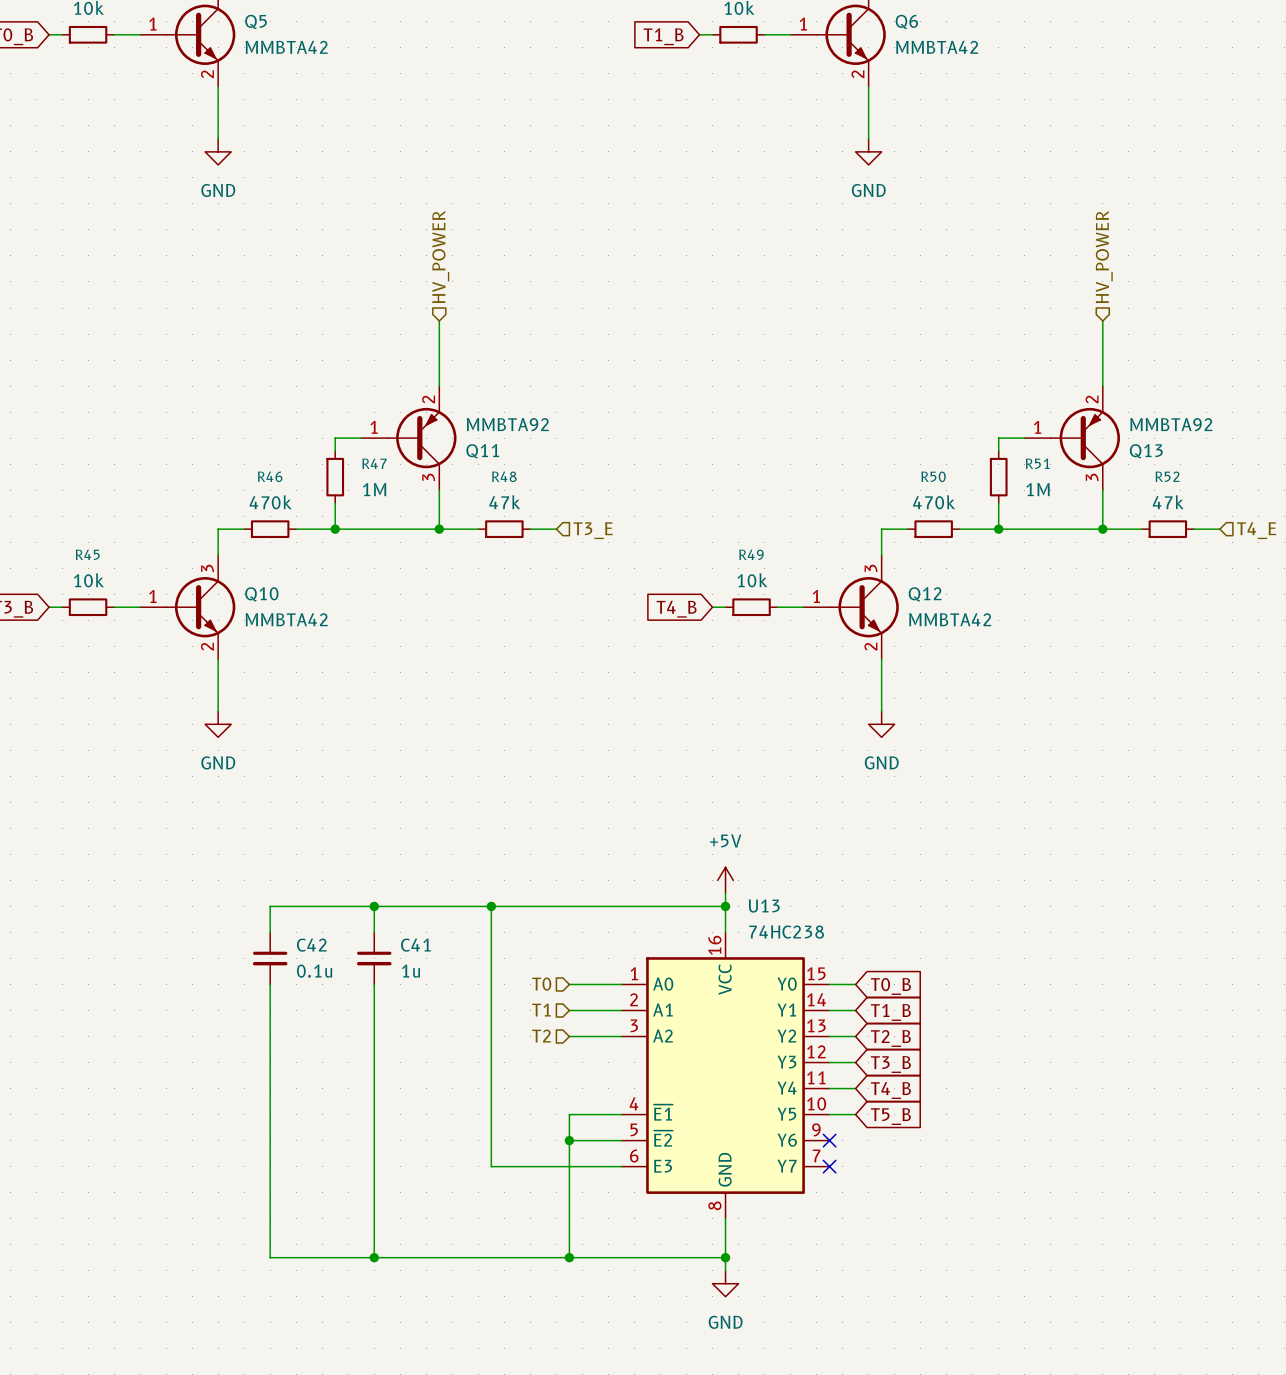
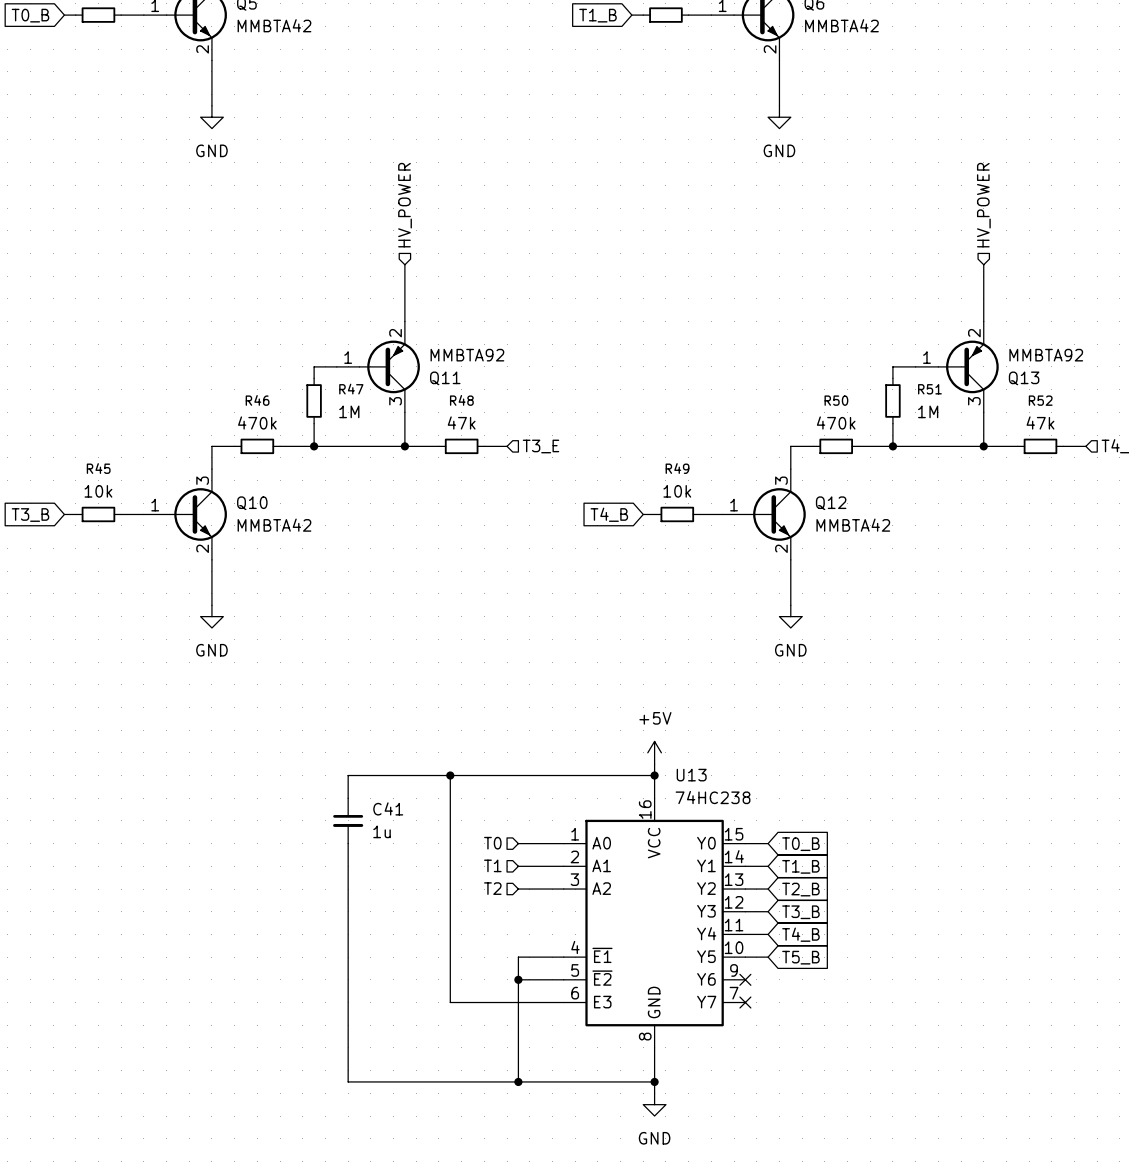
wire: (374, 906) (270, 906) (270, 932) -> none
junction: (374, 906) -> none
C42: 0.1u (270, 958) -> none
wire: (270, 984) (270, 1257) (374, 1257) -> none
junction: (374, 1257) -> none

